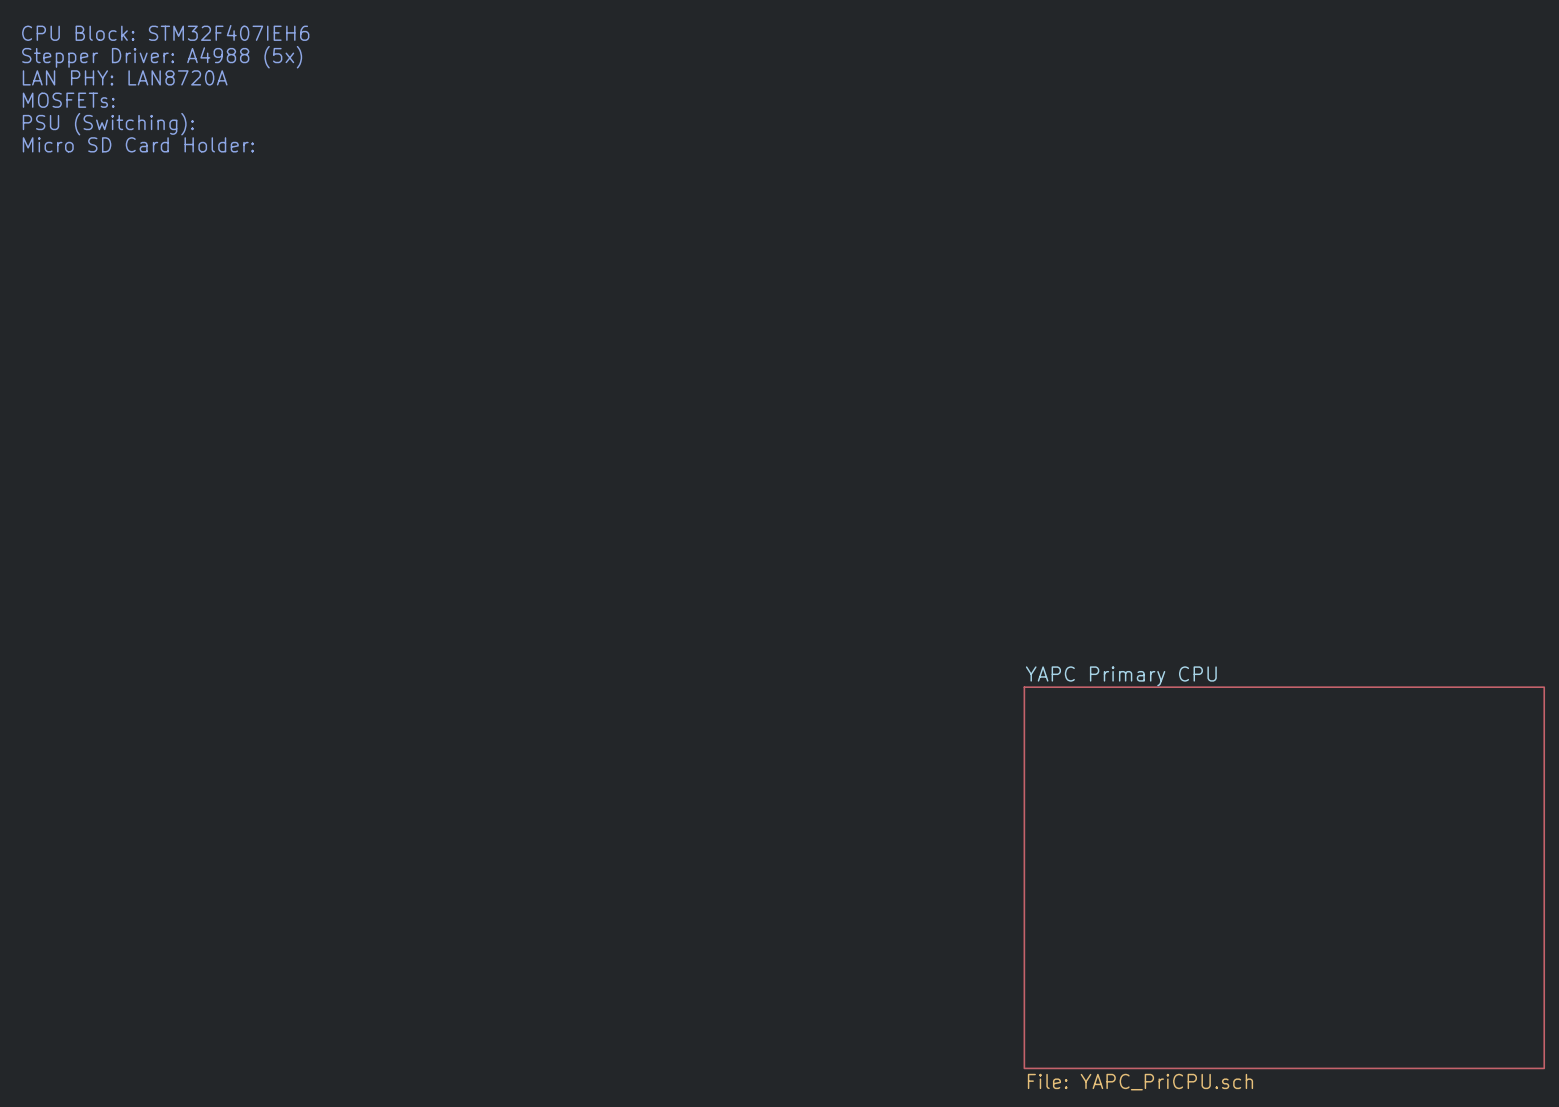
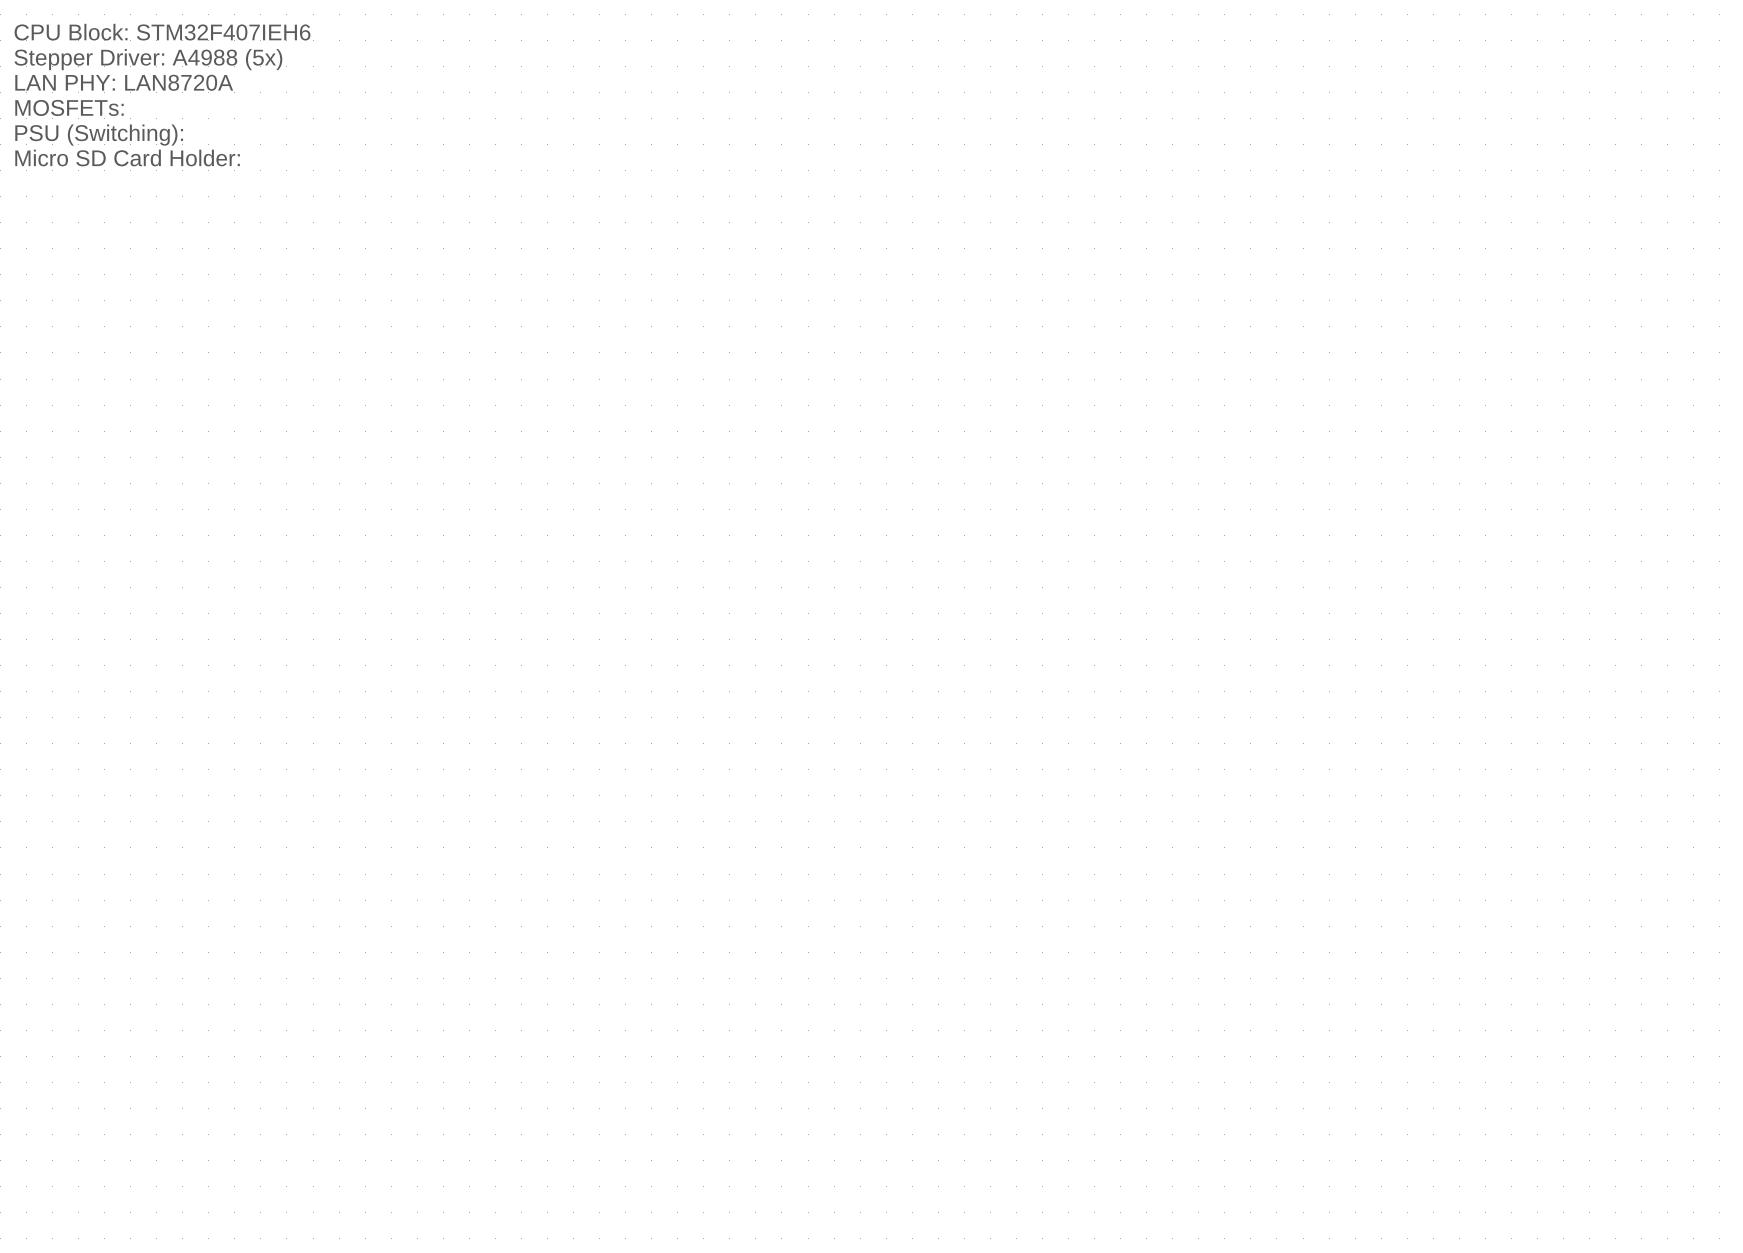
sheet YAPC Primary CPU: File: YAPC_PriCPU.sch (1284, 877) -> none

